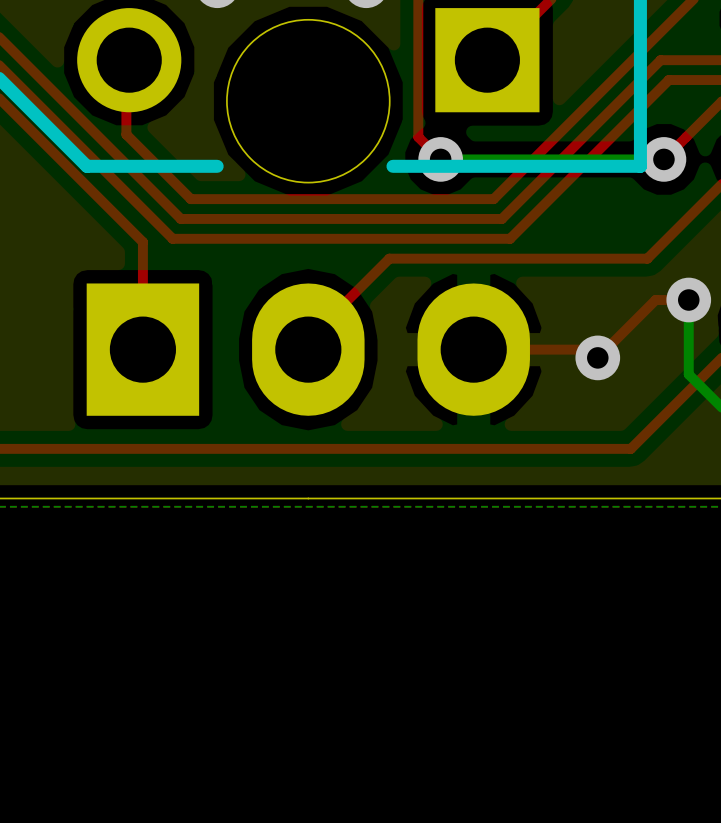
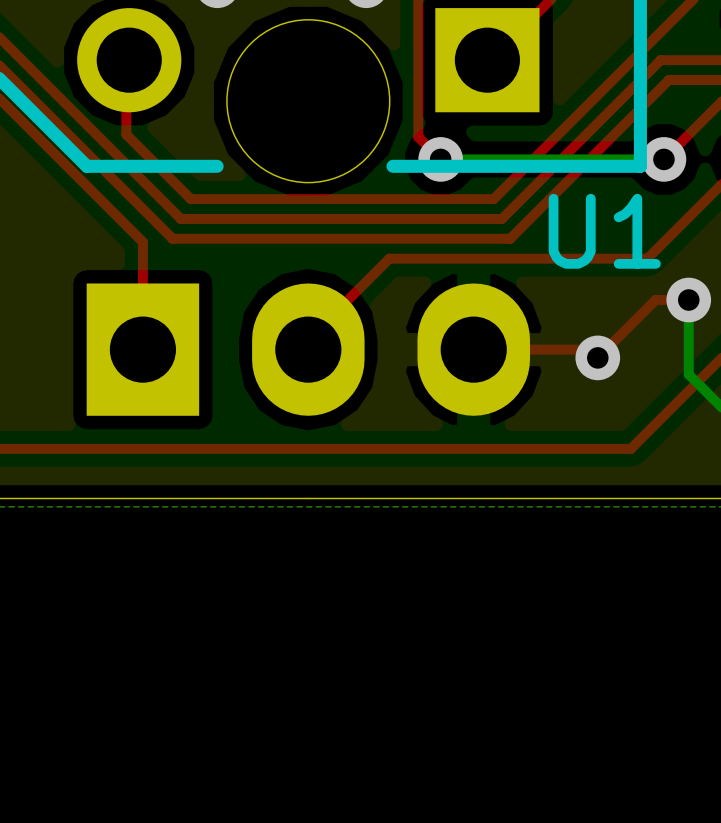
U1 name: none -> U1 (604, 231)

